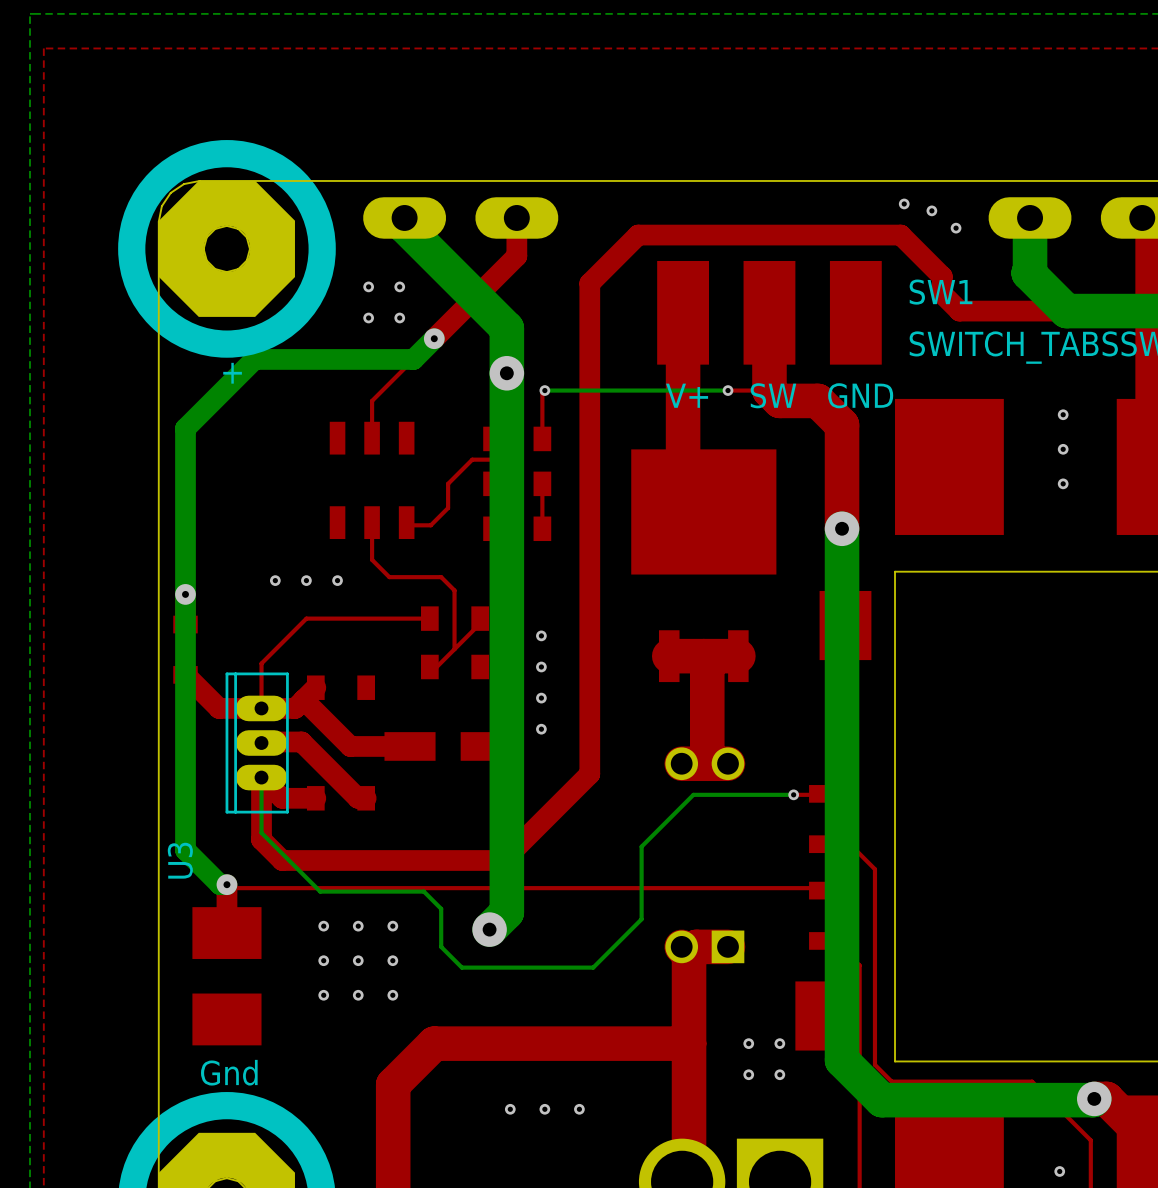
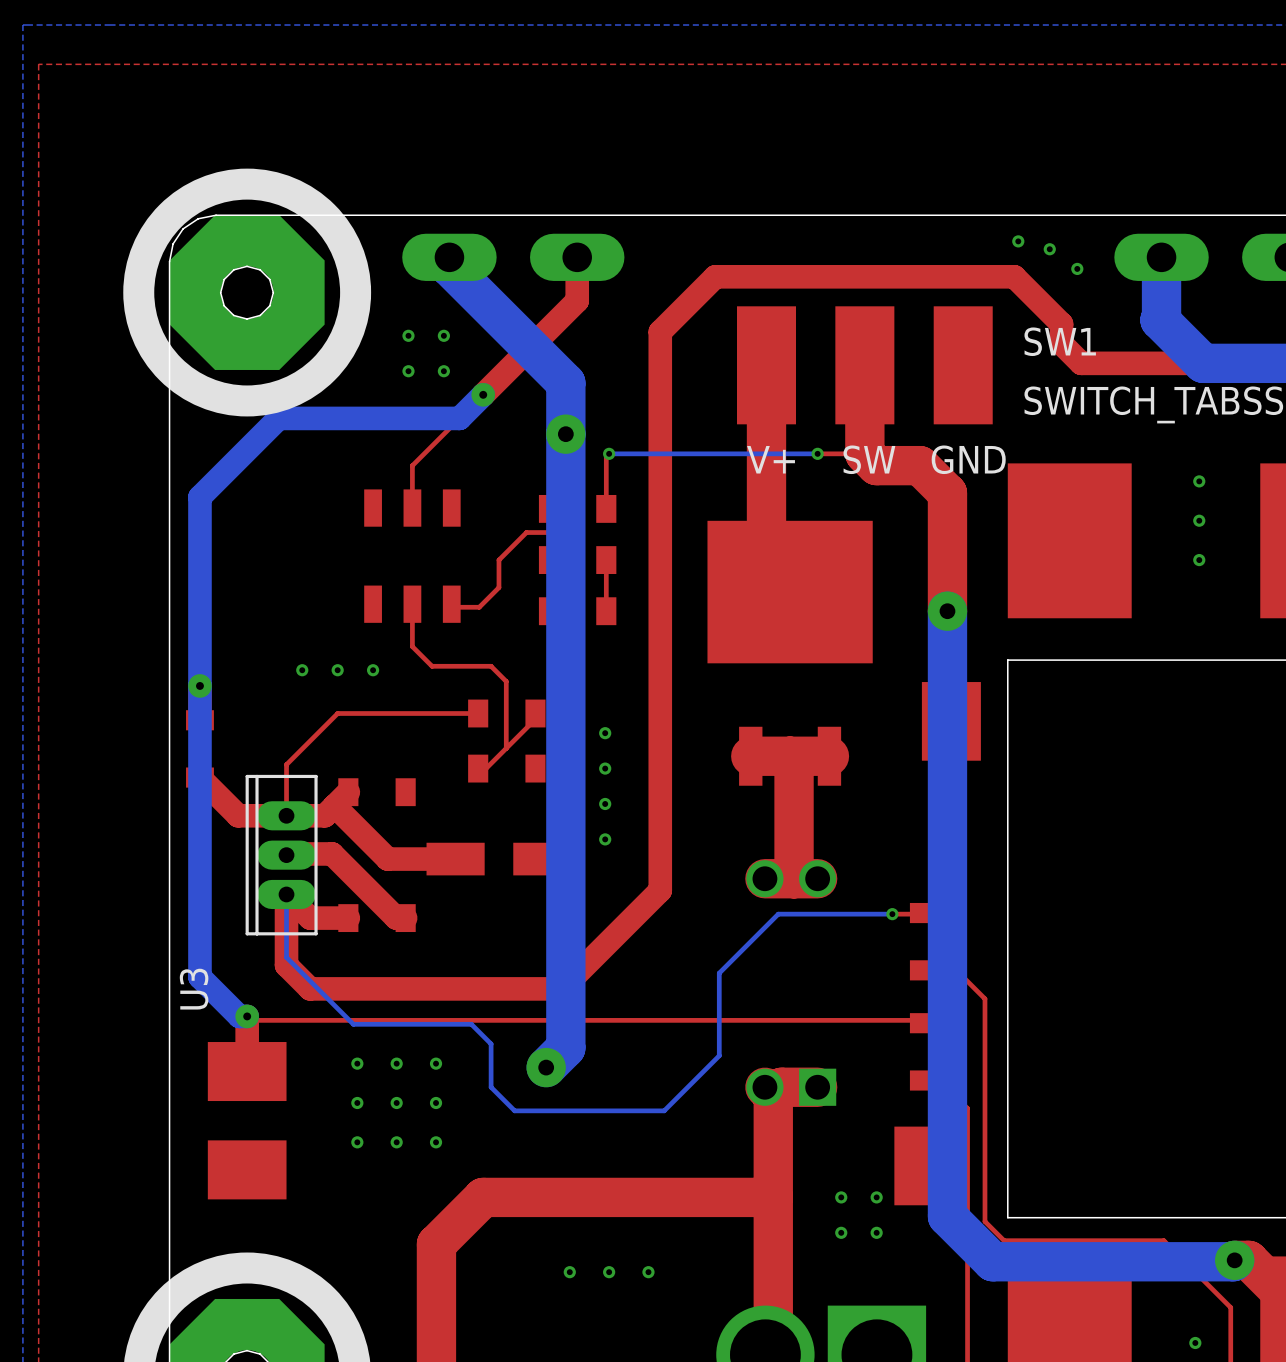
text: + (232, 373) -> none
text: Gnd (229, 1072) -> none

